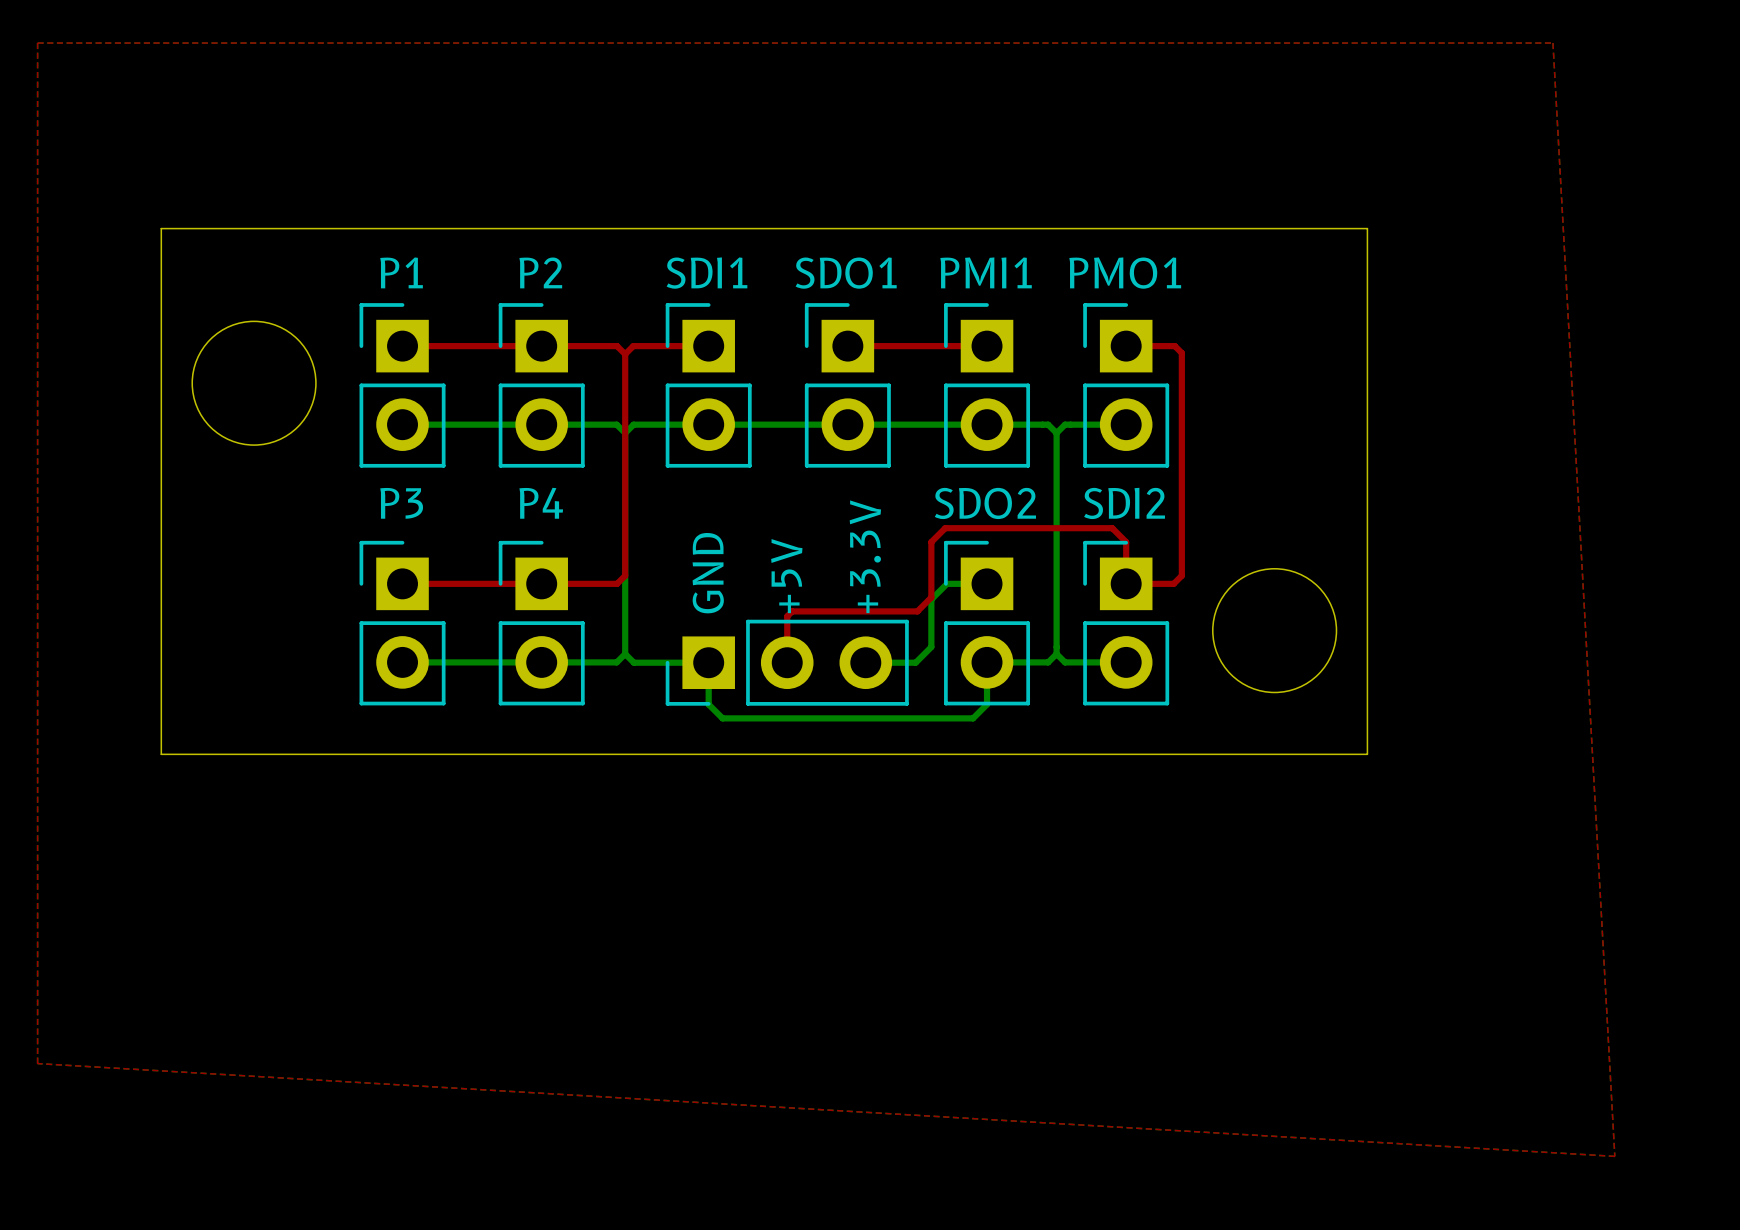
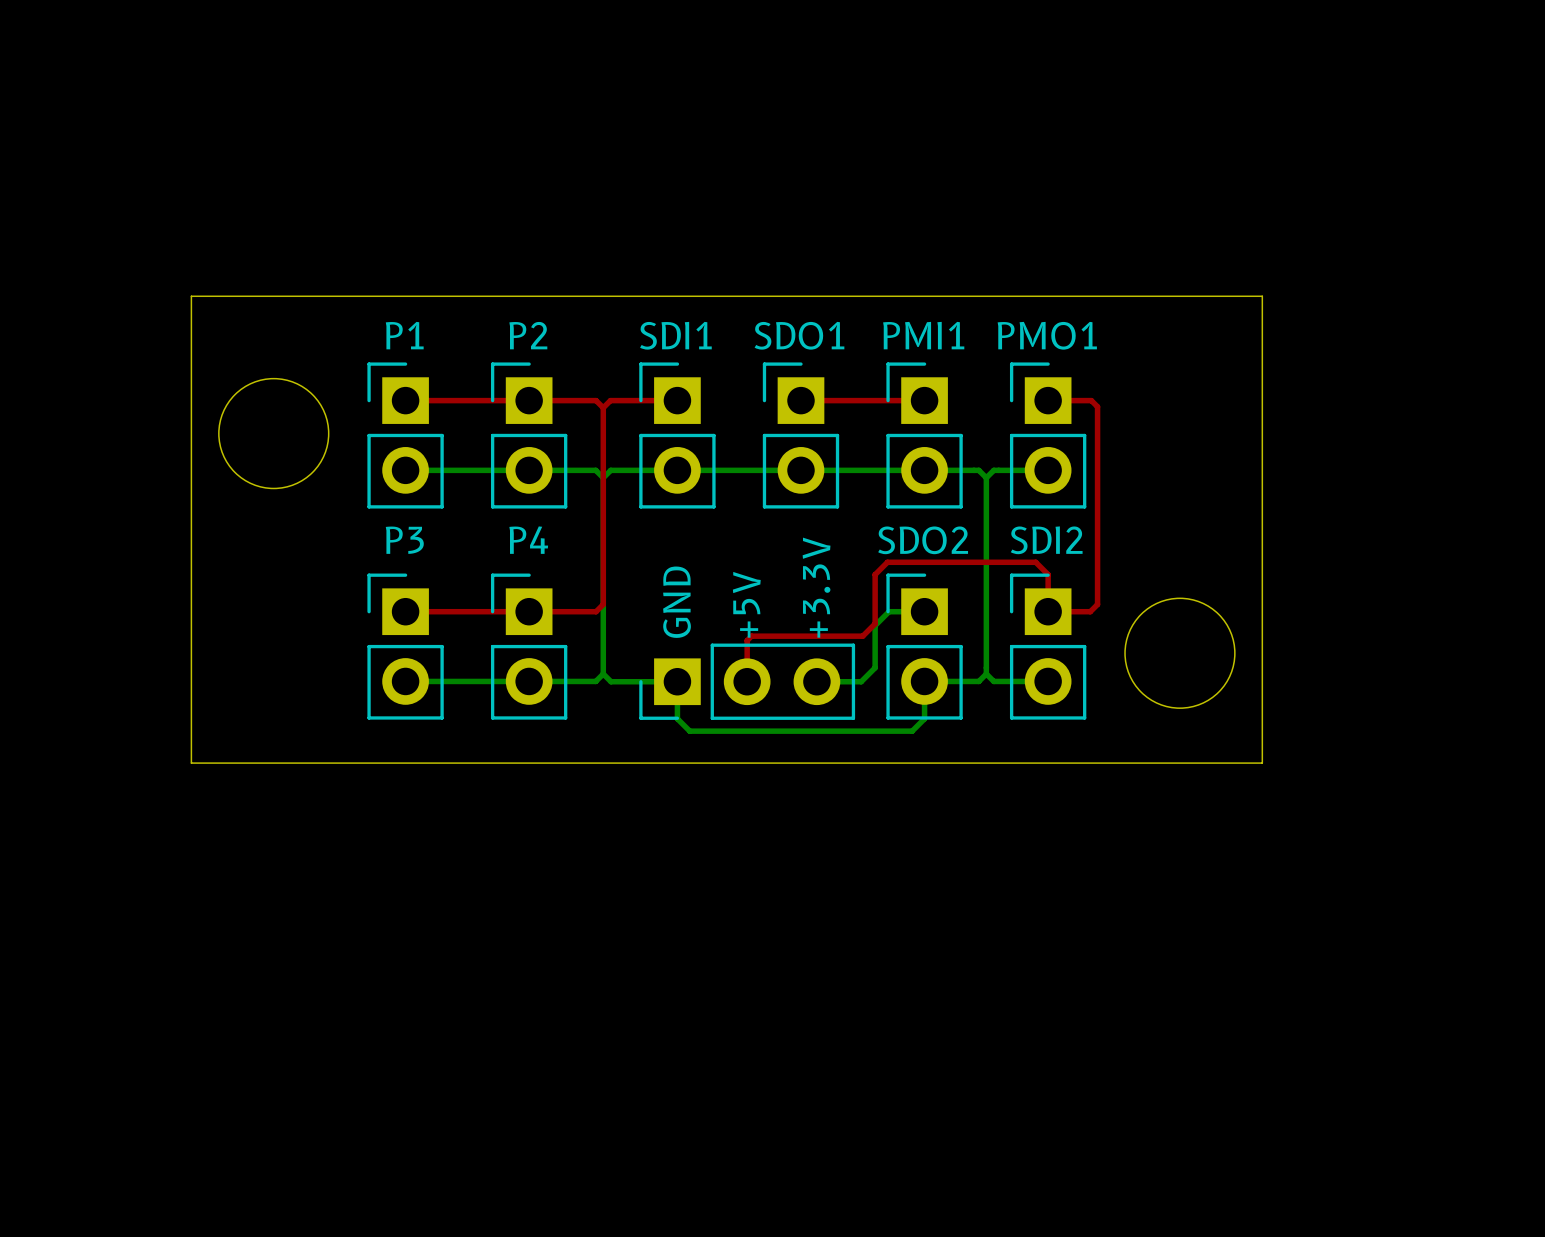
top zone outline: (37, 43) (1552, 43) (1614, 1156) (37, 1063) (37, 43) -> none

